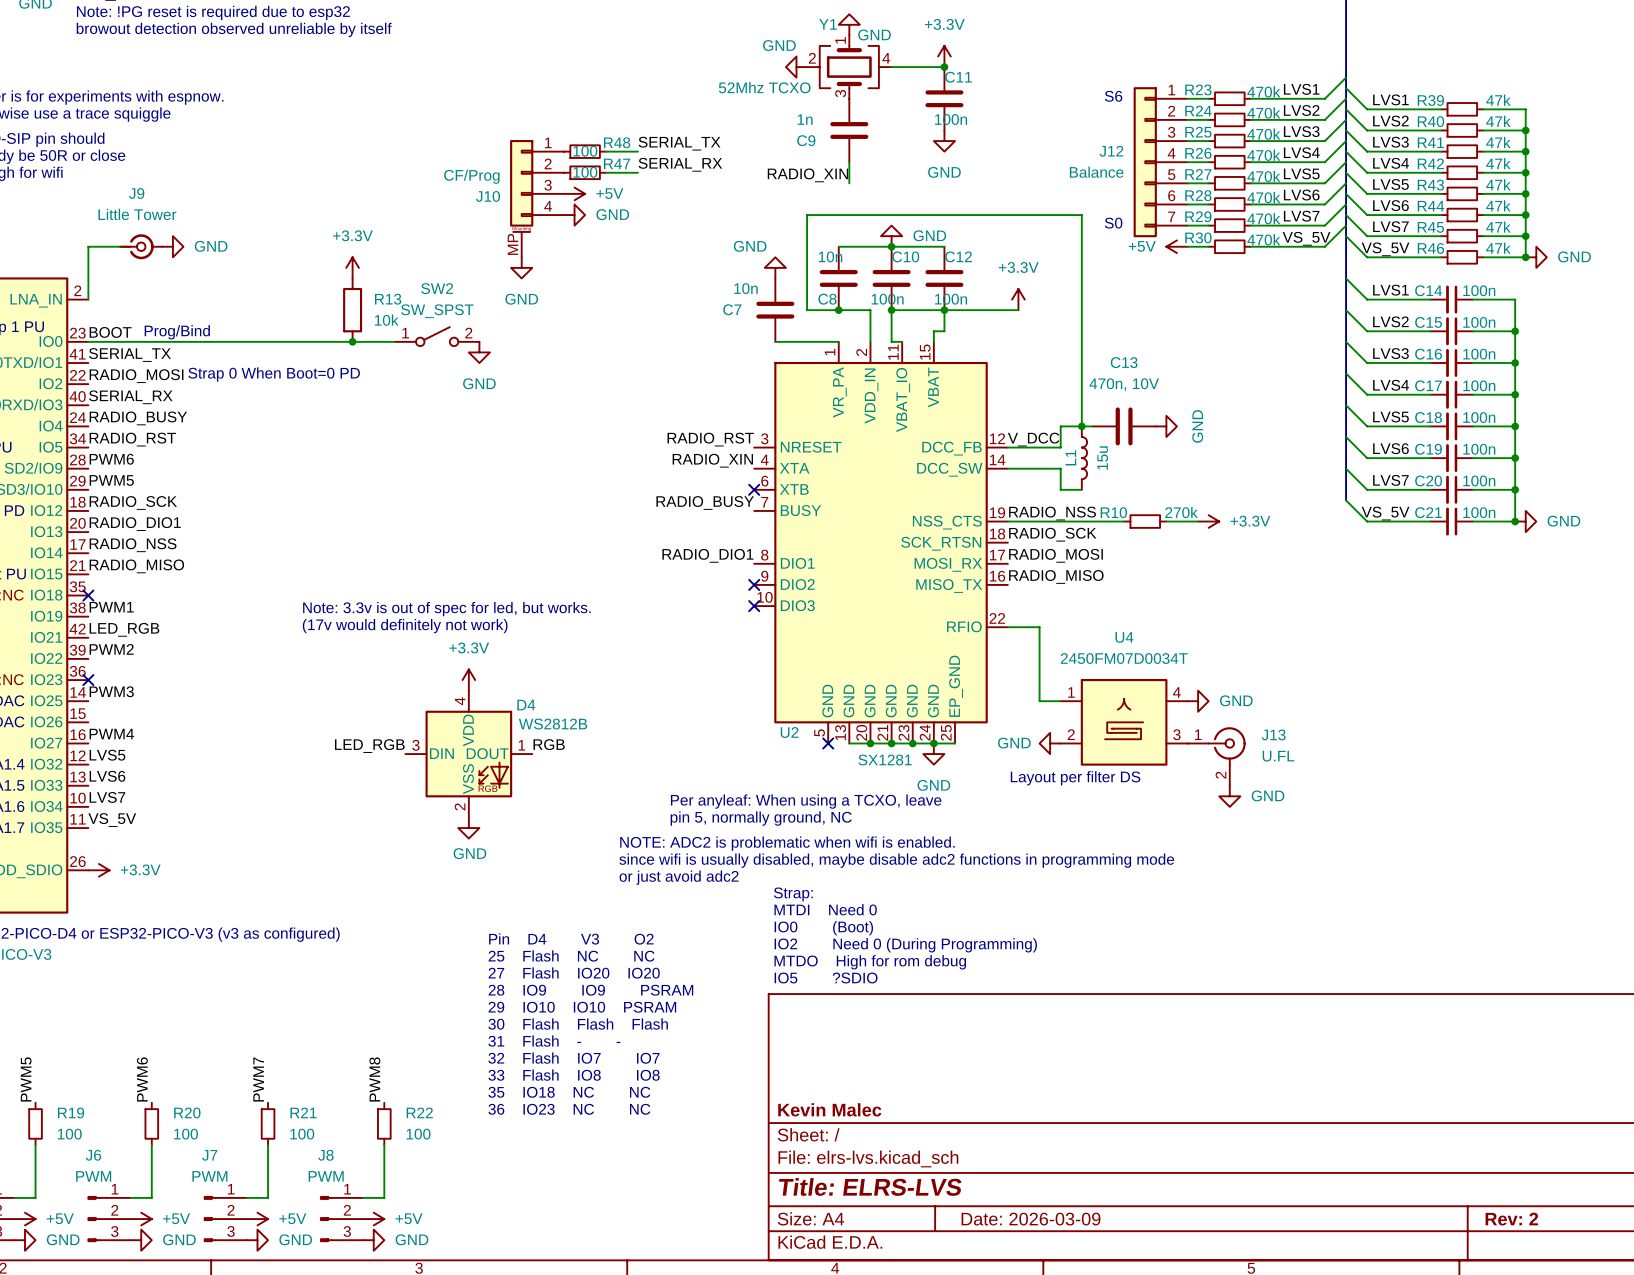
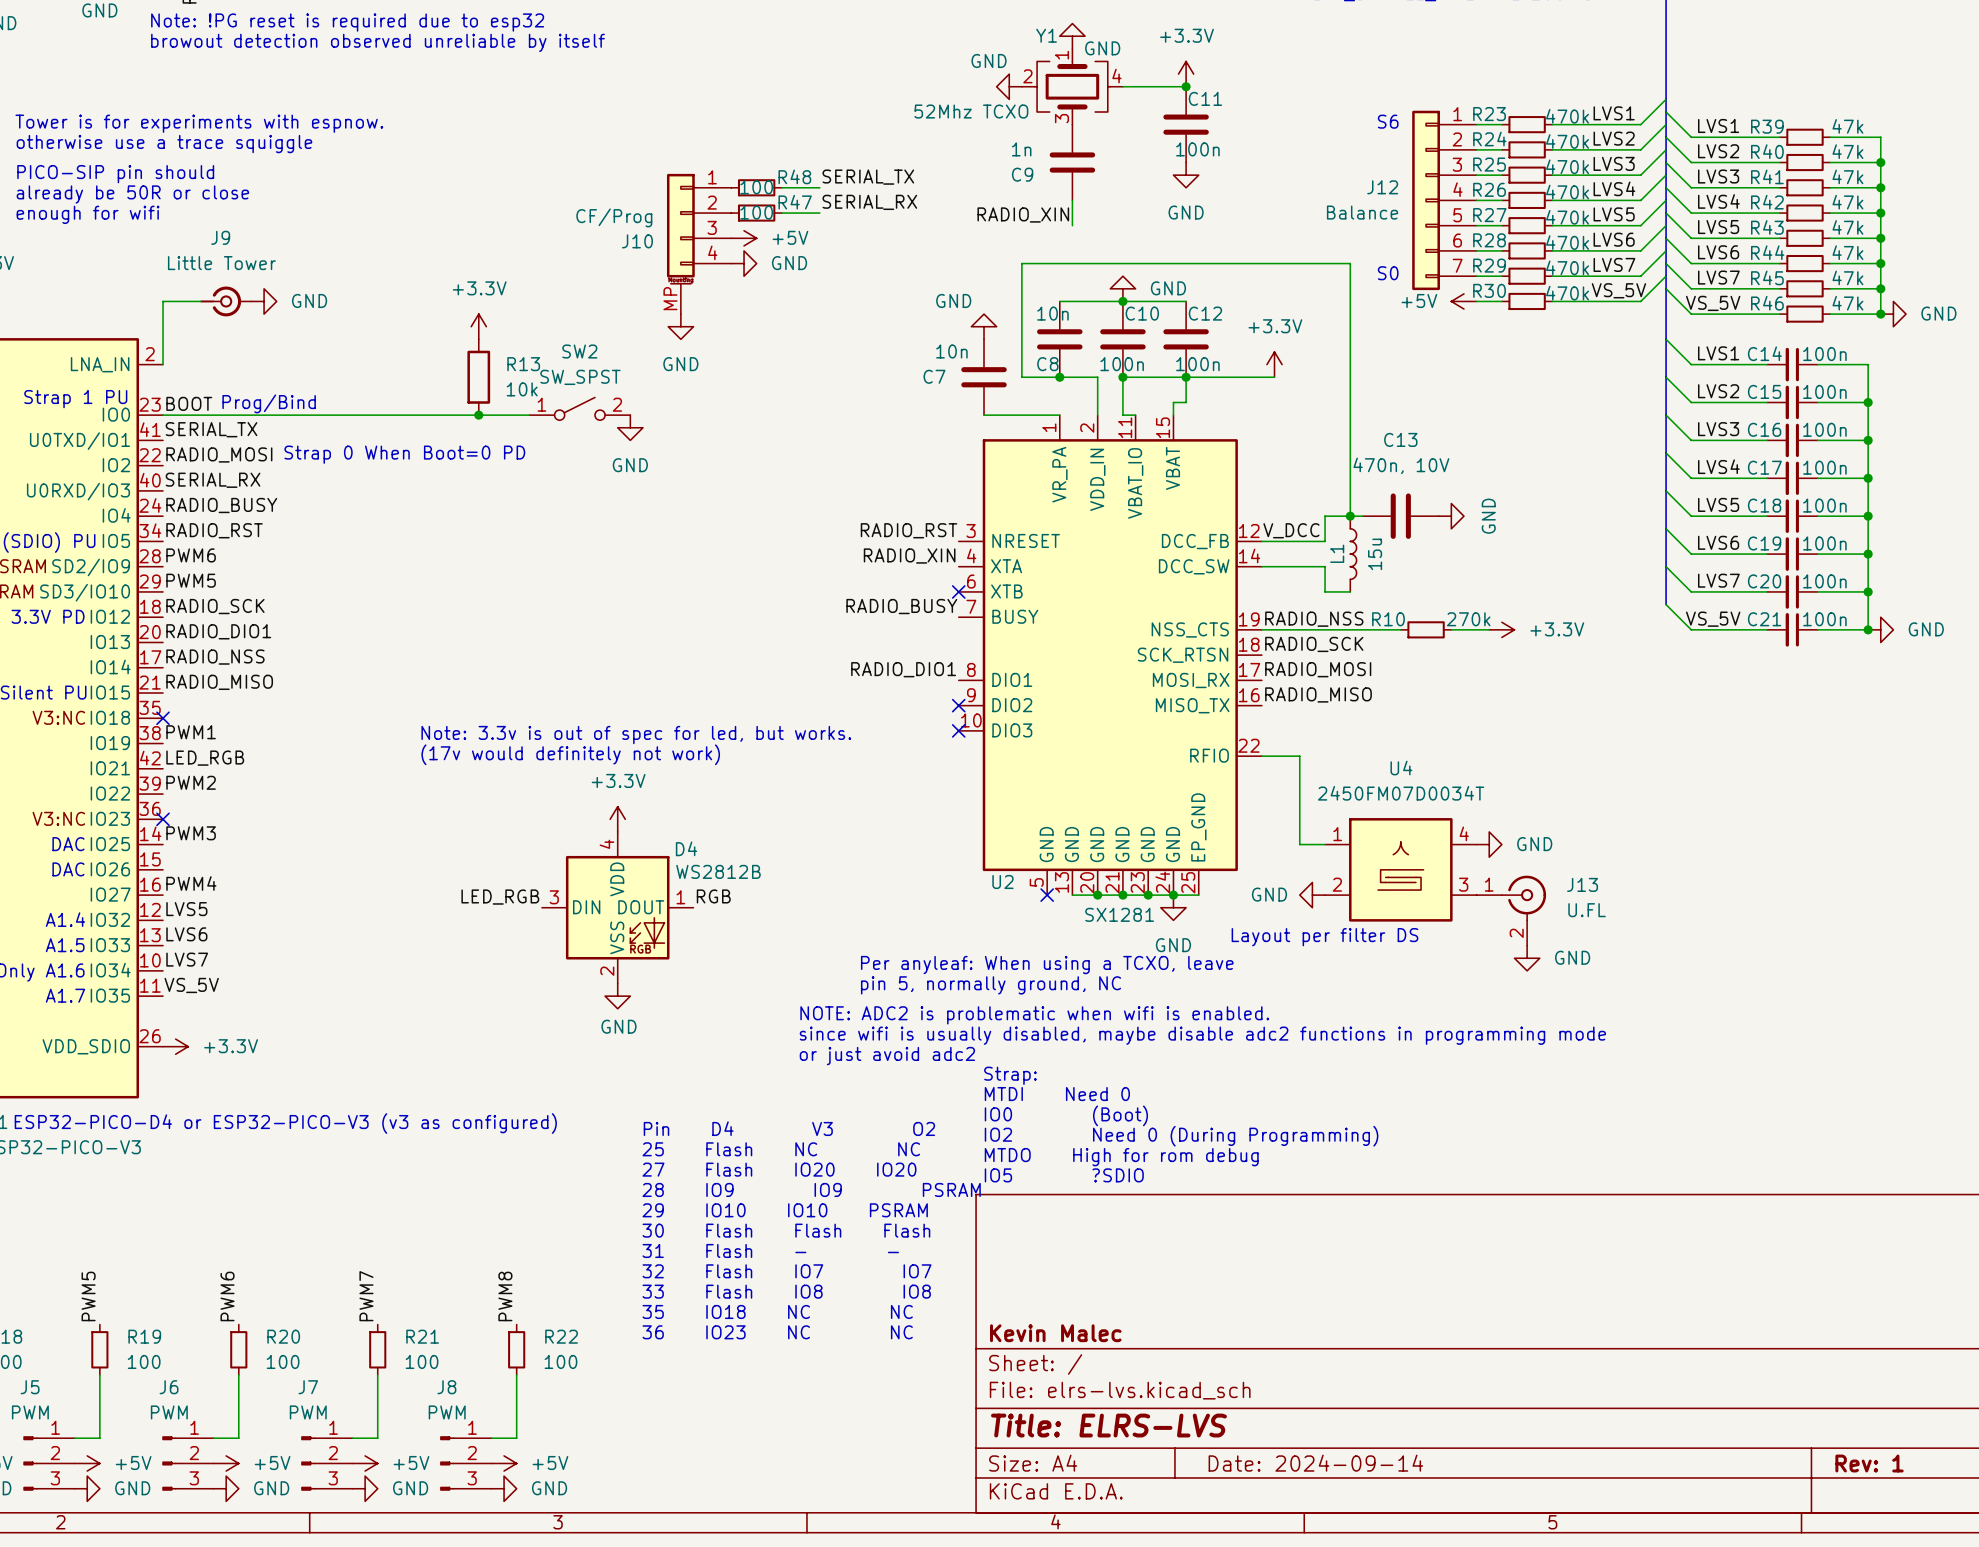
title block: Date: 2026-03-09 (1031, 1219) -> Date: 2024-09-14 (1315, 1463)
title block: Rev: 2 (1511, 1219) -> Rev: 1 (1869, 1463)

